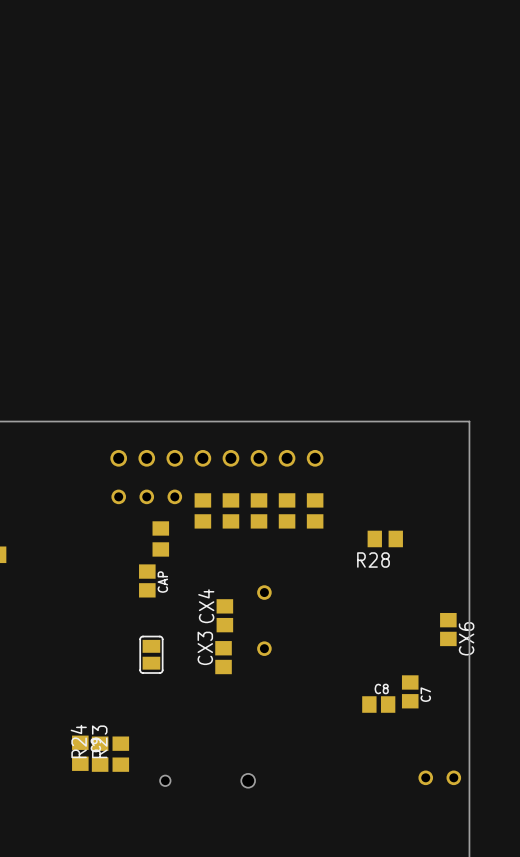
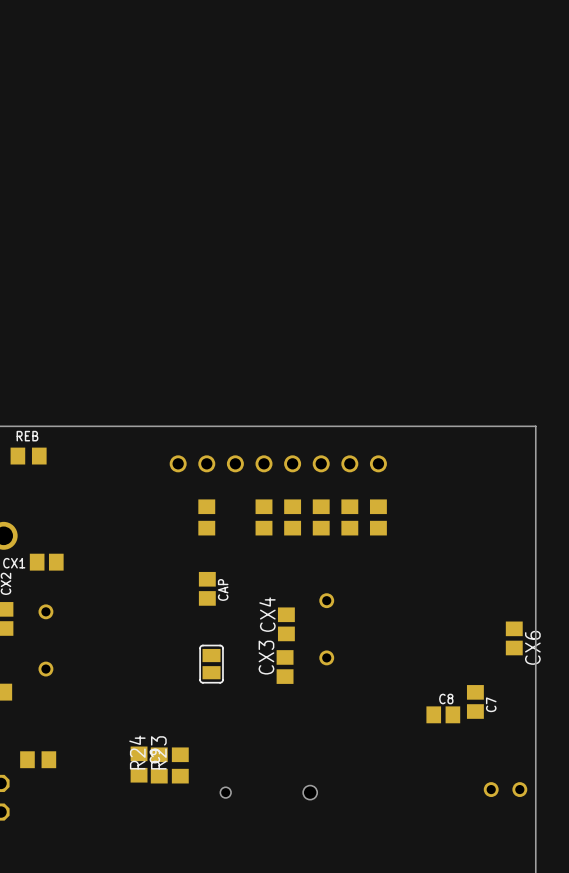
part: (146, 496) -> none
part position: (160, 538) -> (206, 517)
R28: (385, 538) -> none

